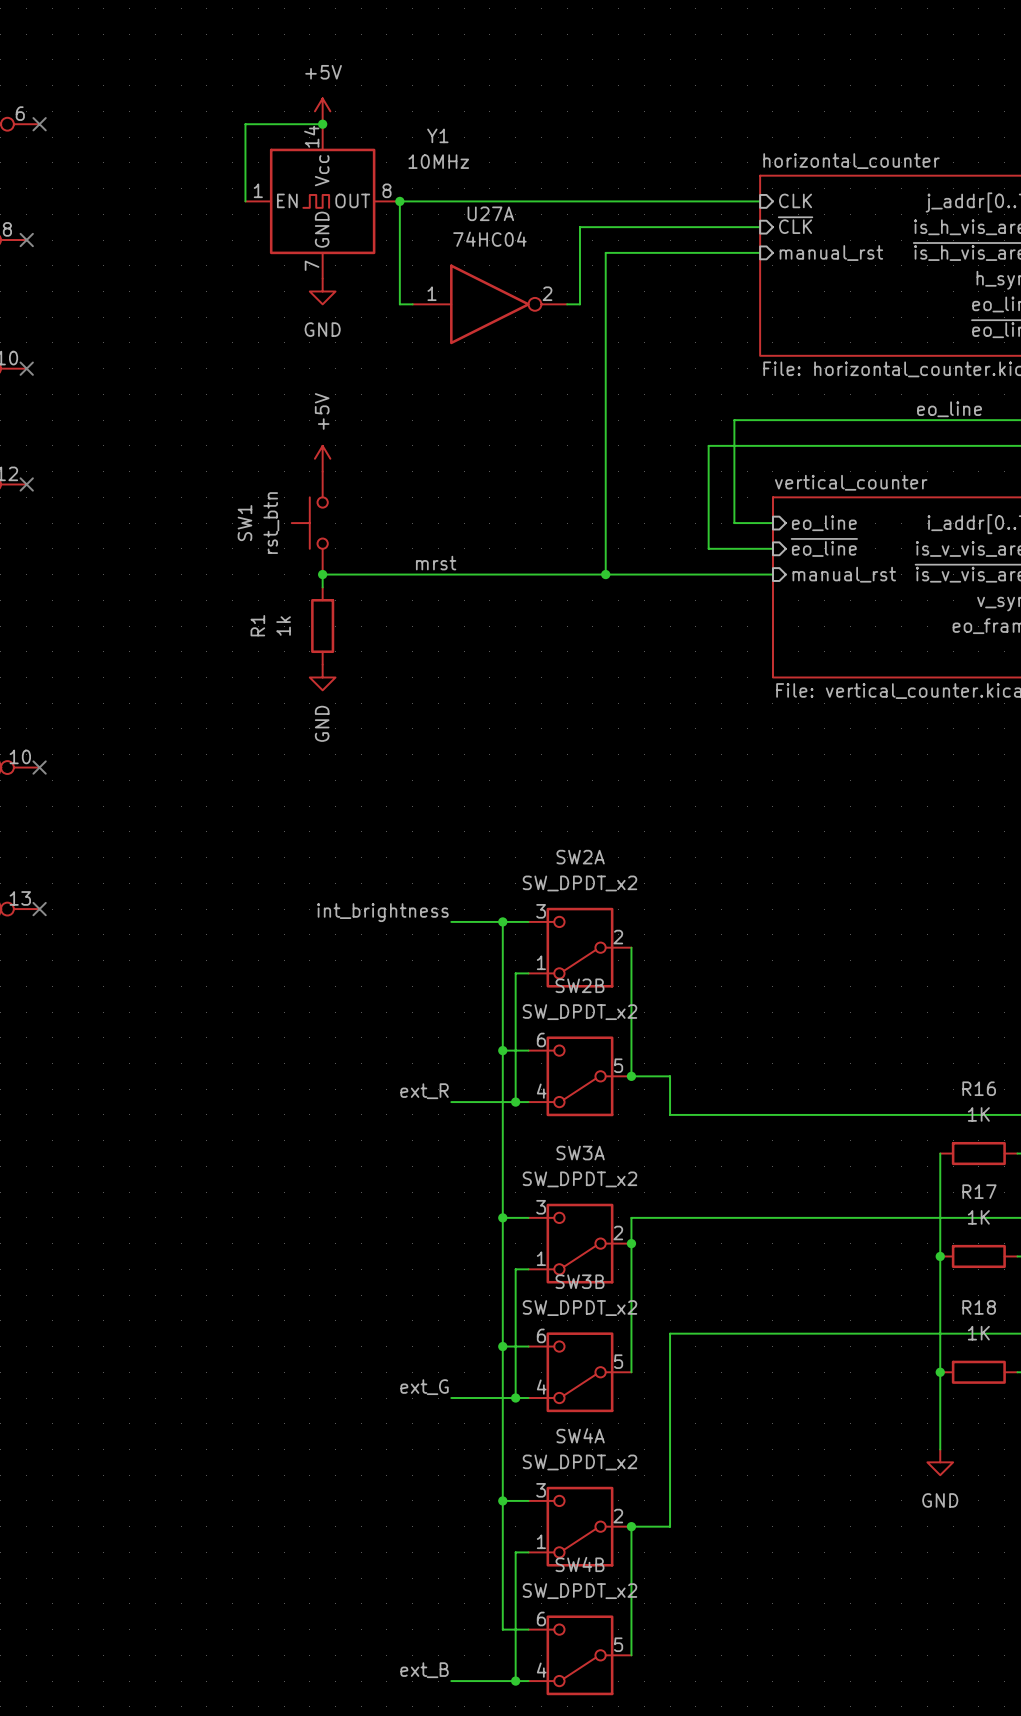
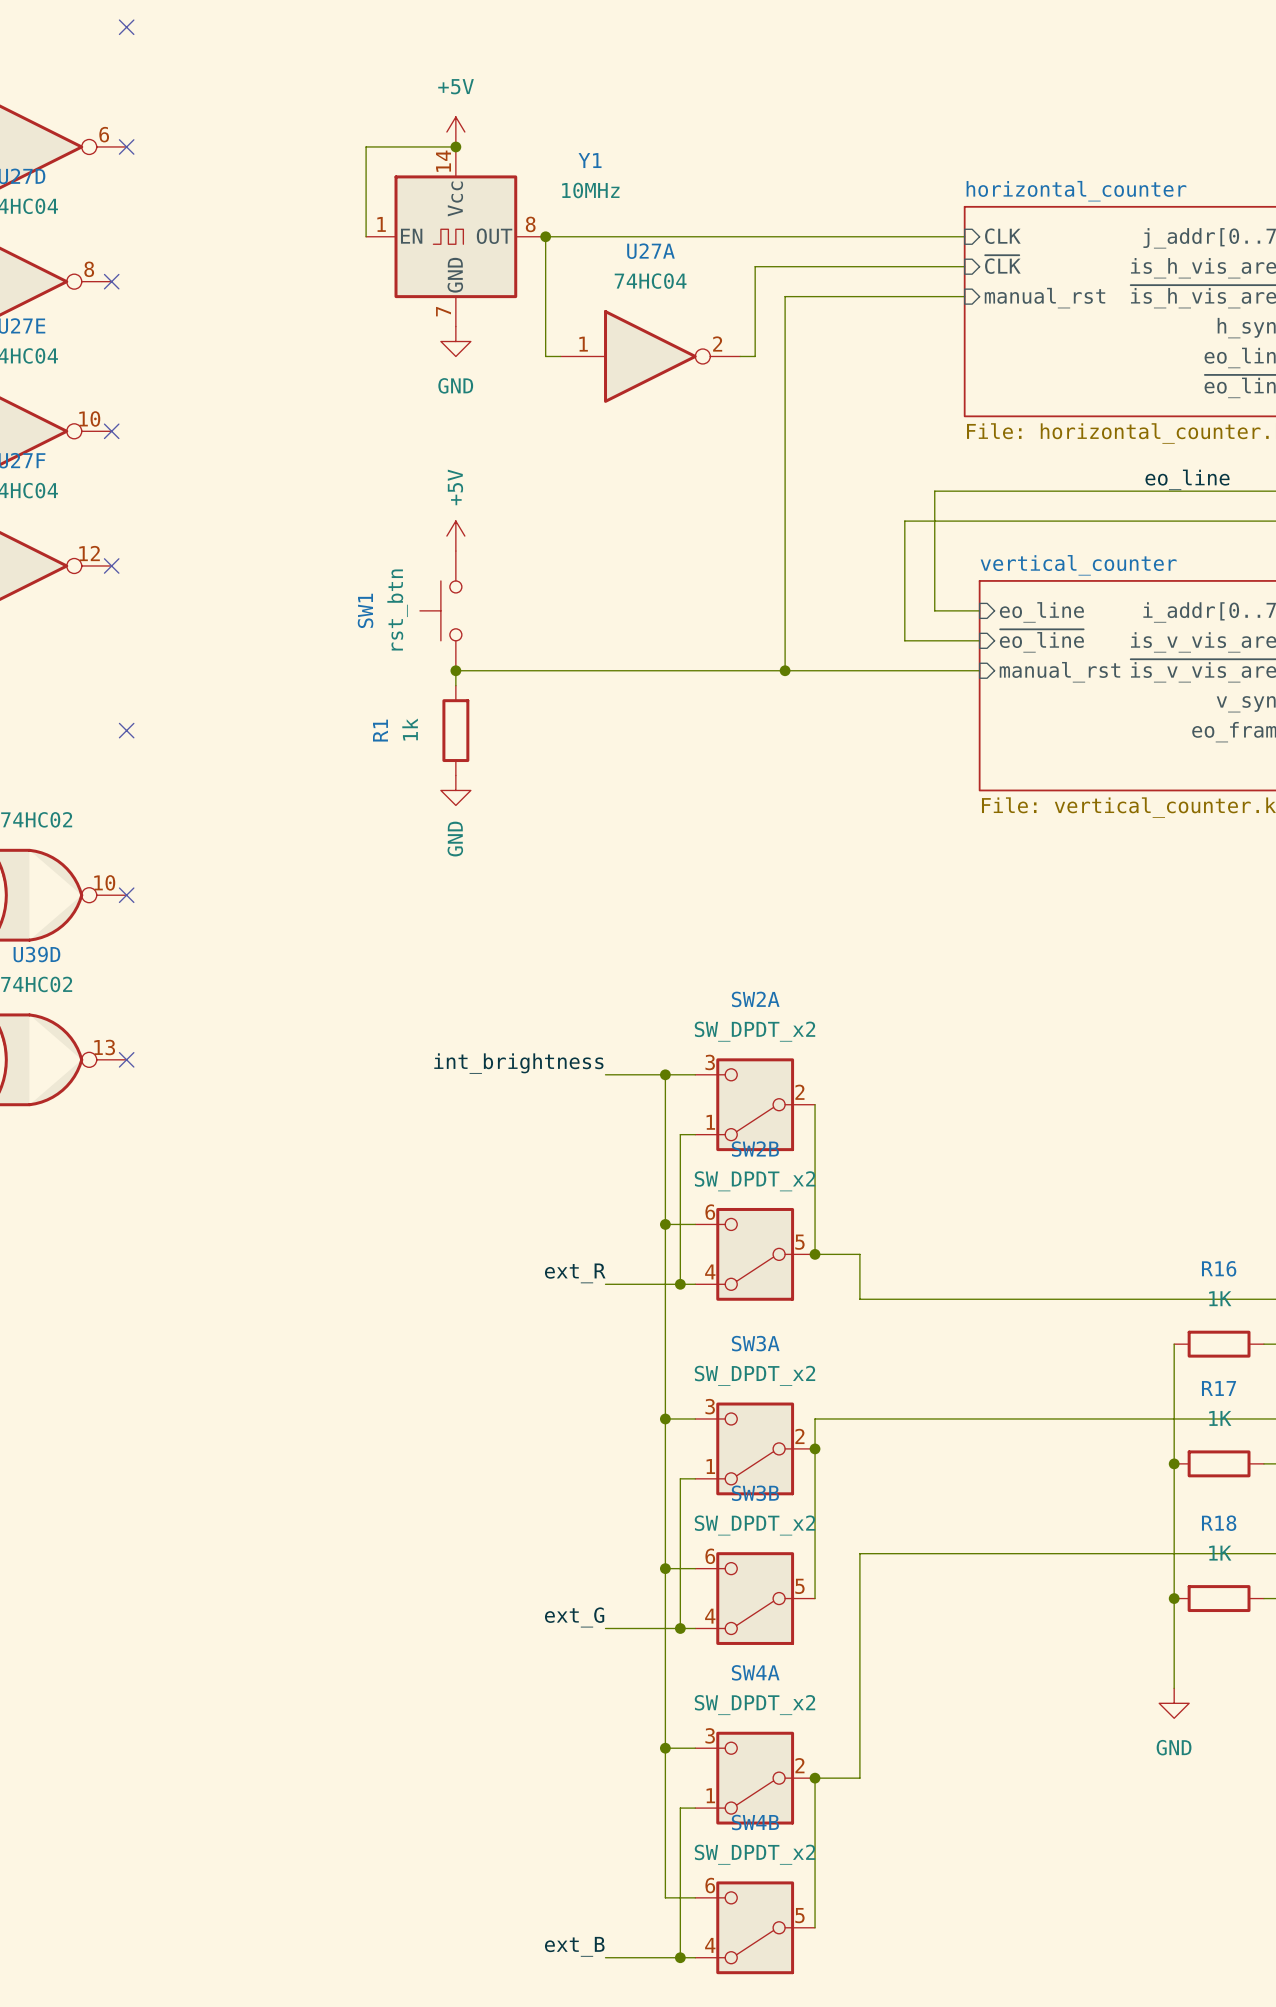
no-connect mark: none -> (126, 27)
label: mrst (436, 563) -> none
no-connect mark: none -> (126, 730)

